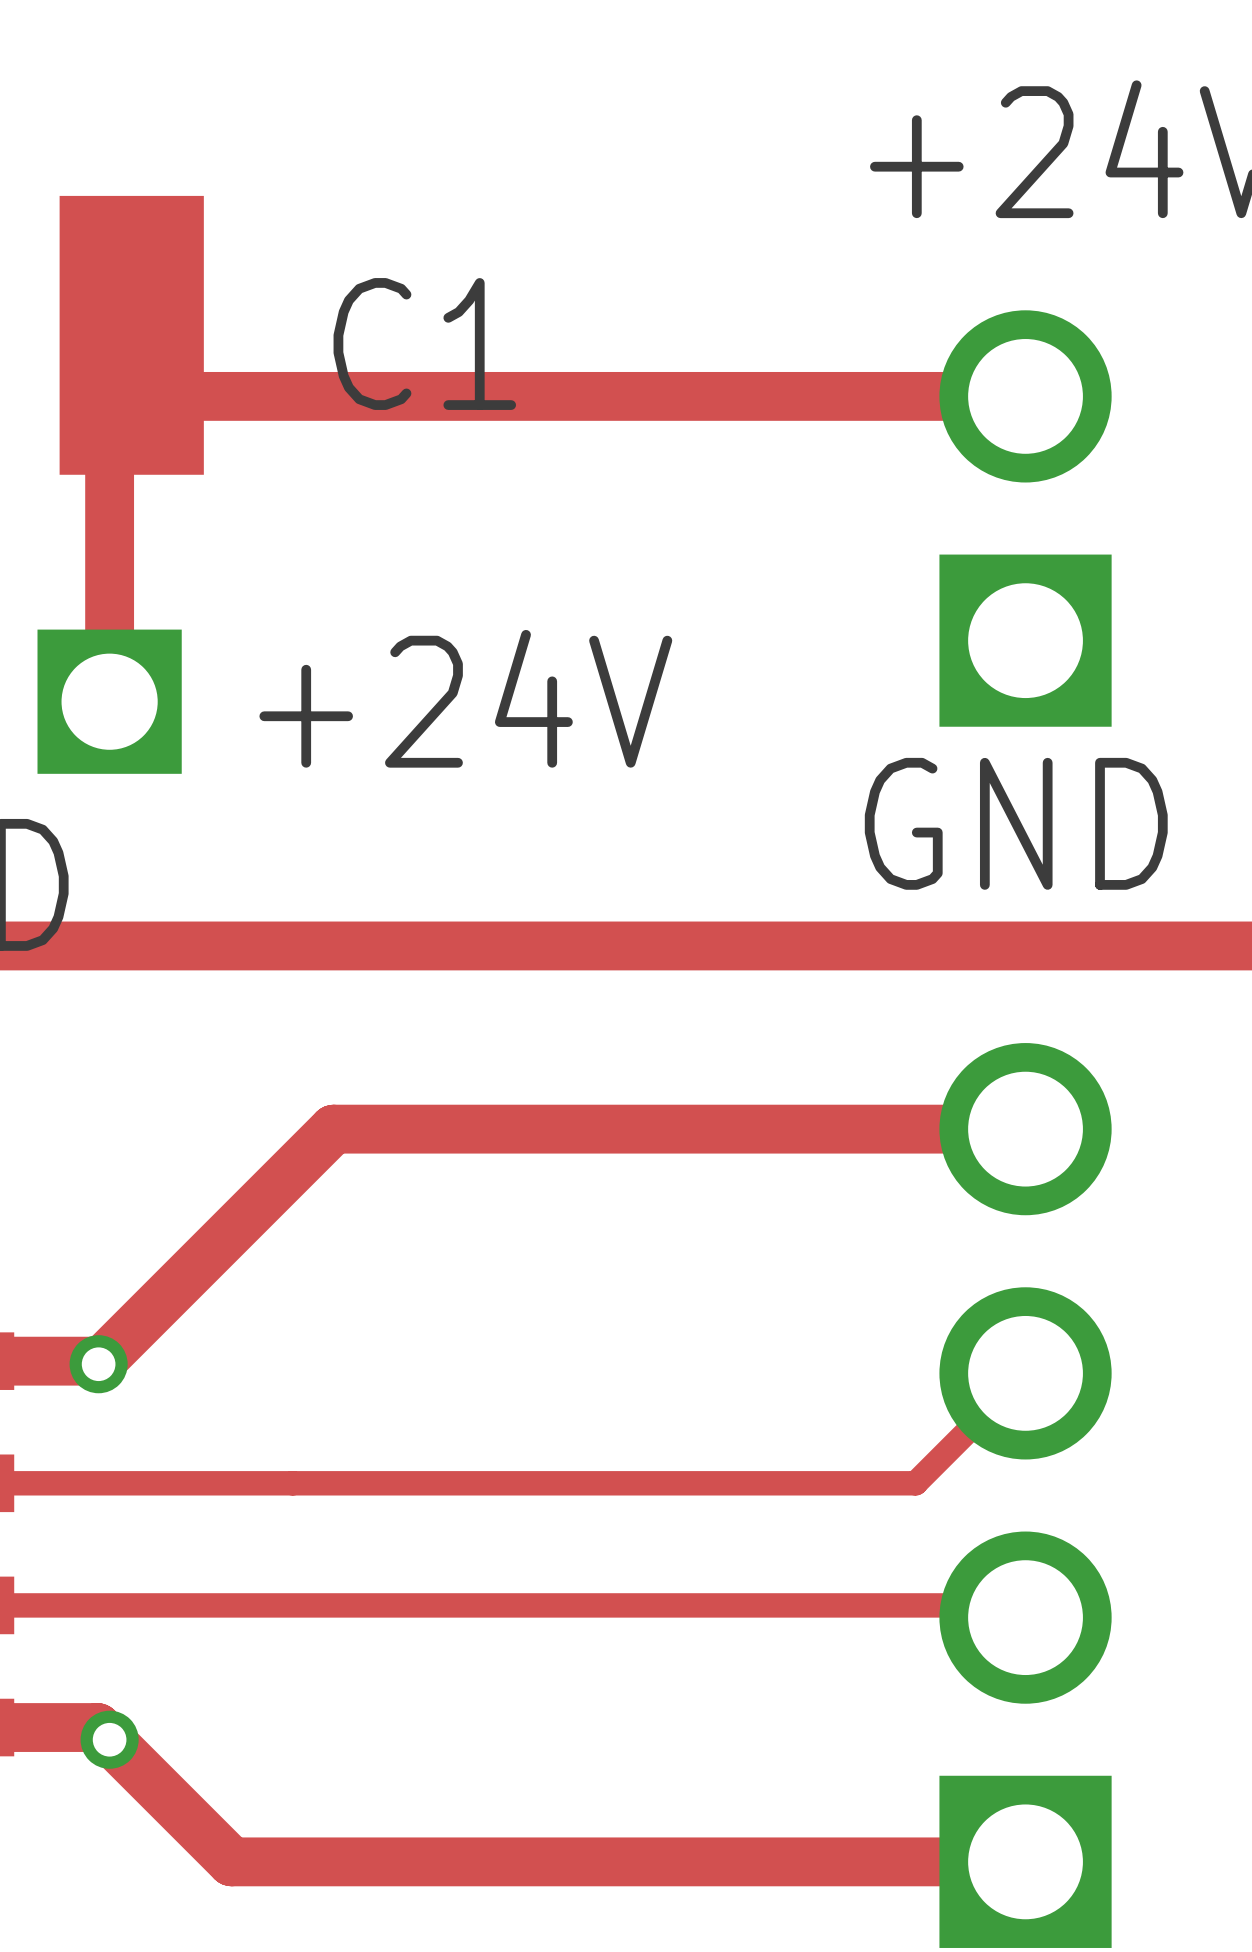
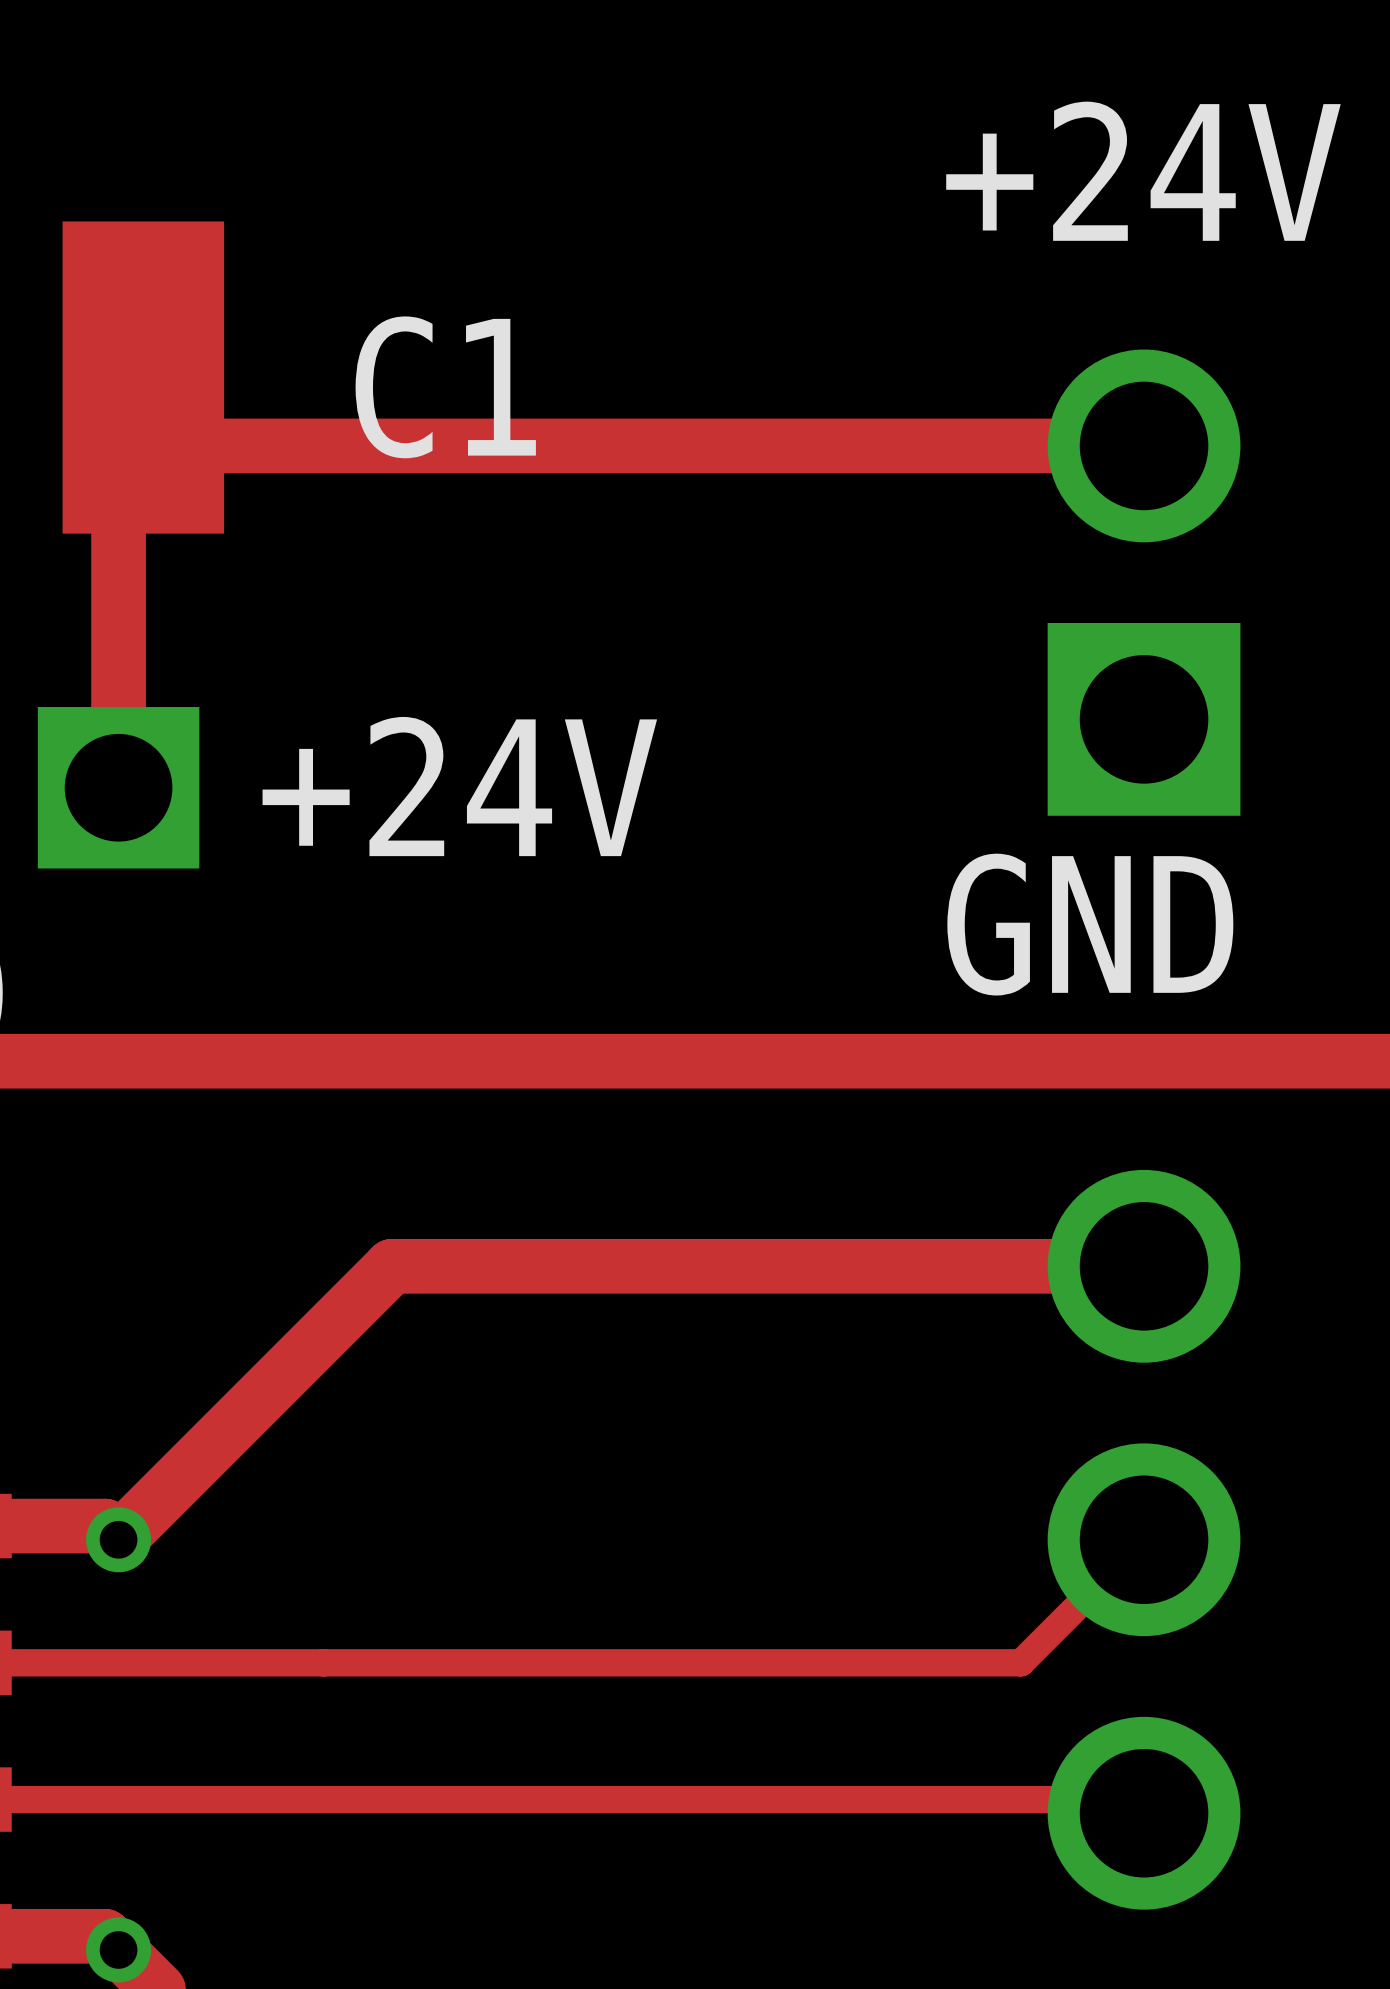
track: (353, 1129) (333, 1129) (98, 1364) (98, 1361) -> (392, 1266) (118, 1539) (104, 1526)
via position: (98, 1364) -> (118, 1539)

